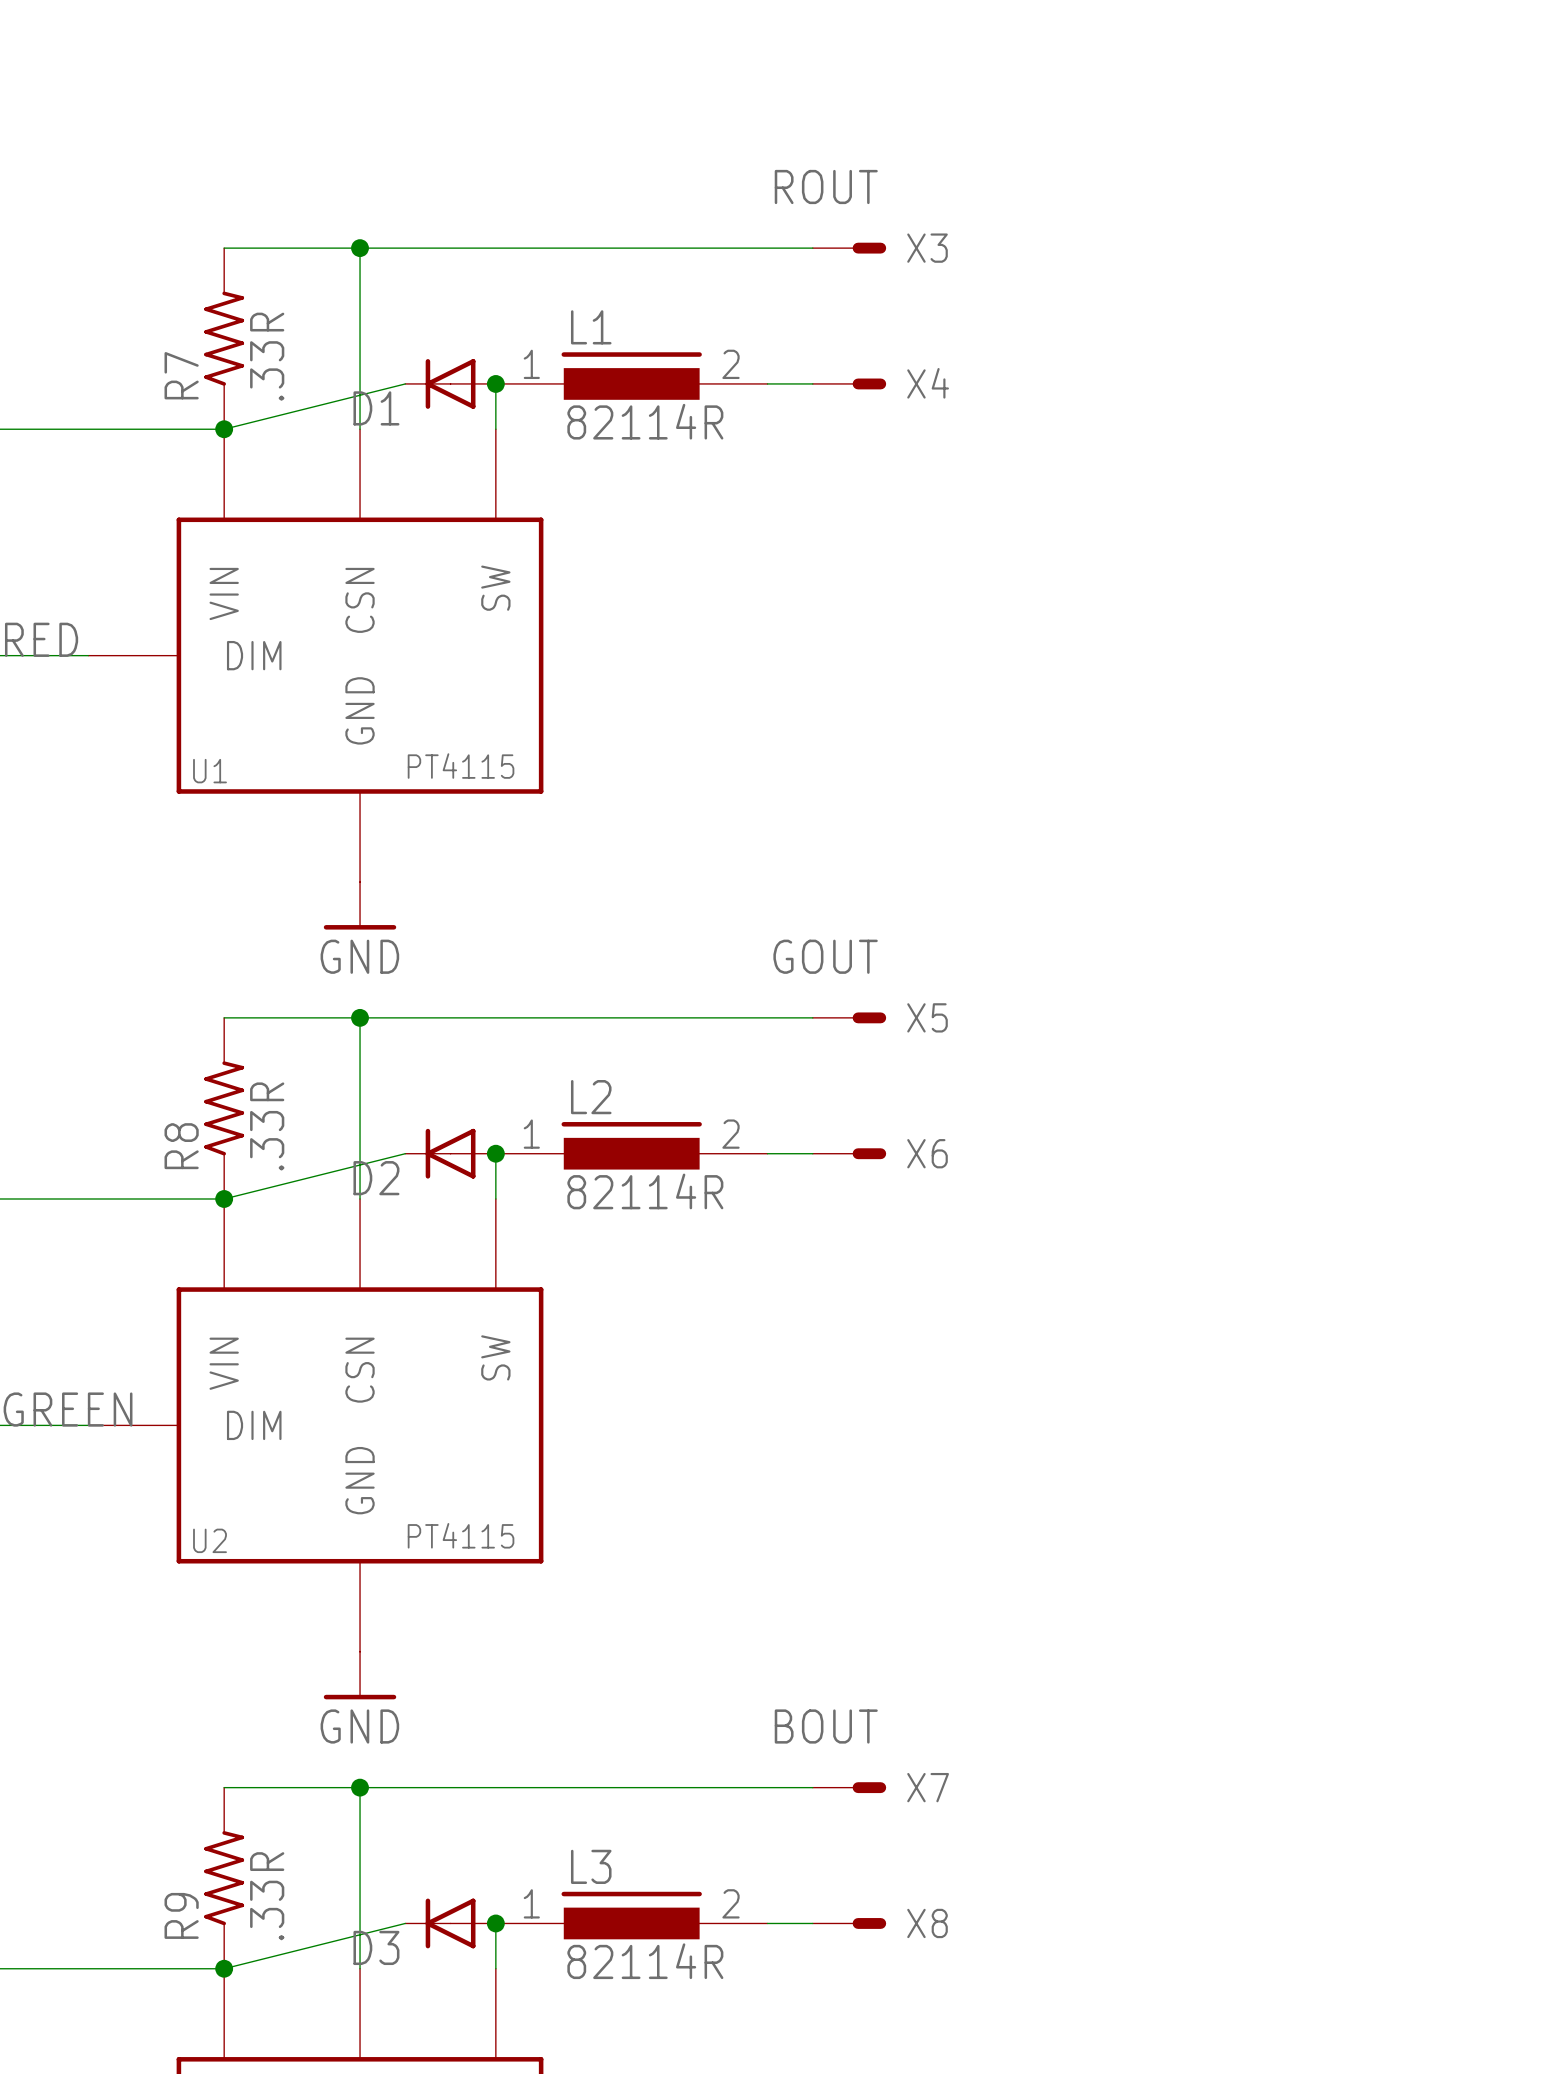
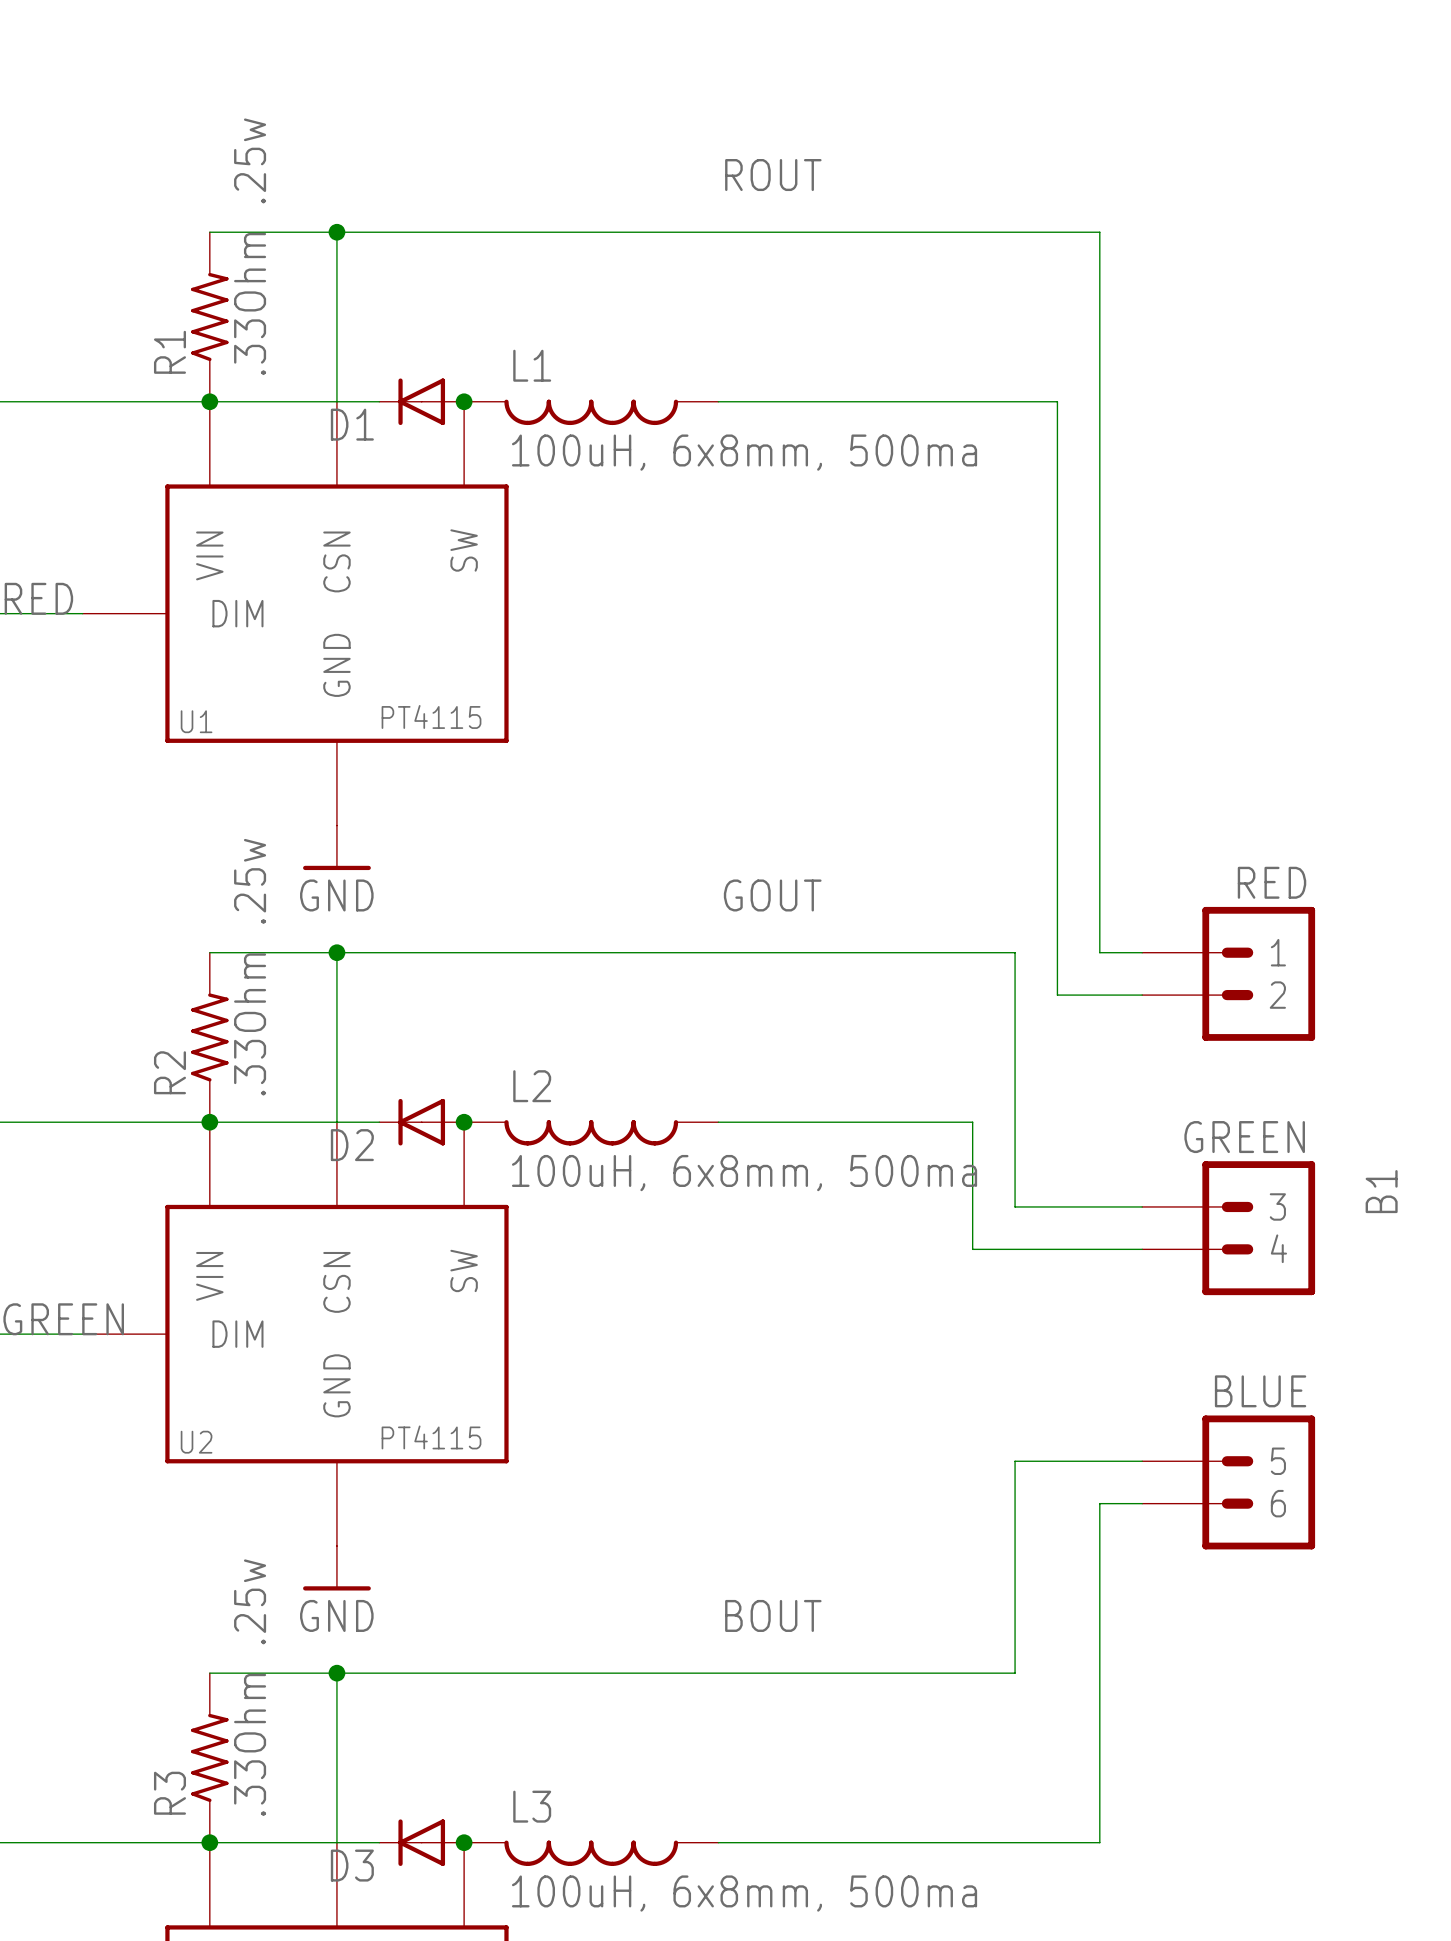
wire: none -> (760, 232) (1099, 232) (1099, 952) (1142, 952)
X3: (849, 248) -> none
L1 symbol: [495, 352, 768, 400] -> [464, 399, 719, 426]
R7 value: .33R (267, 356) -> .33Ohm .25w (250, 246)
R7 name: R7 (181, 375) -> R1 (169, 352)
wire: (405, 383) (224, 429) -> (379, 401) (209, 401)
D1 position: (450, 383) -> (421, 401)
wire: (495, 383) (495, 429) -> none
junction position: (495, 383) -> (464, 401)
wire: (767, 383) (812, 383) -> none
X4: (849, 383) -> none
L1 value: 82114R (645, 421) -> 100uH, 6x8mm, 500ma (744, 452)
wire: none -> (718, 401) (1057, 401) (1057, 995) (1142, 995)
wire: none -> (760, 952) (1015, 952) (1015, 1206) (1142, 1206)
X5: (849, 1017) -> none
L2 symbol: [495, 1122, 768, 1170] -> [464, 1120, 719, 1146]
R8 value: .33R (267, 1126) -> .33Ohm .25w (250, 967)
R8 name: R8 (181, 1146) -> R2 (169, 1072)
wire: (405, 1153) (224, 1198) -> (379, 1122) (209, 1122)
D2 position: (450, 1153) -> (421, 1122)
wire: (495, 1153) (495, 1198) -> none
junction position: (495, 1153) -> (464, 1122)
wire: (767, 1153) (812, 1153) -> none
X6: (849, 1153) -> none
L2 value: 82114R (645, 1191) -> 100uH, 6x8mm, 500ma (744, 1173)
wire: none -> (718, 1122) (972, 1122) (972, 1249) (1142, 1249)
B1: none -> (1228, 1228)
wire: none -> (1142, 1461) (1015, 1461) (1015, 1673) (760, 1673)
wire: none -> (1142, 1503) (1099, 1503) (1099, 1842) (718, 1842)
X7: (849, 1787) -> none
L3 symbol: [495, 1891, 768, 1940] -> [464, 1840, 719, 1866]
R9 value: .33R (267, 1896) -> .33Ohm .25w (250, 1687)
R9 name: R9 (181, 1915) -> R3 (169, 1793)
wire: (405, 1923) (224, 1968) -> (379, 1842) (209, 1842)
D3 position: (450, 1923) -> (421, 1842)
wire: (495, 1923) (495, 1968) -> none
junction position: (495, 1923) -> (464, 1842)
wire: (767, 1923) (812, 1923) -> none
X8: (849, 1923) -> none
L3 value: 82114R (645, 1961) -> 100uH, 6x8mm, 500ma (744, 1893)

